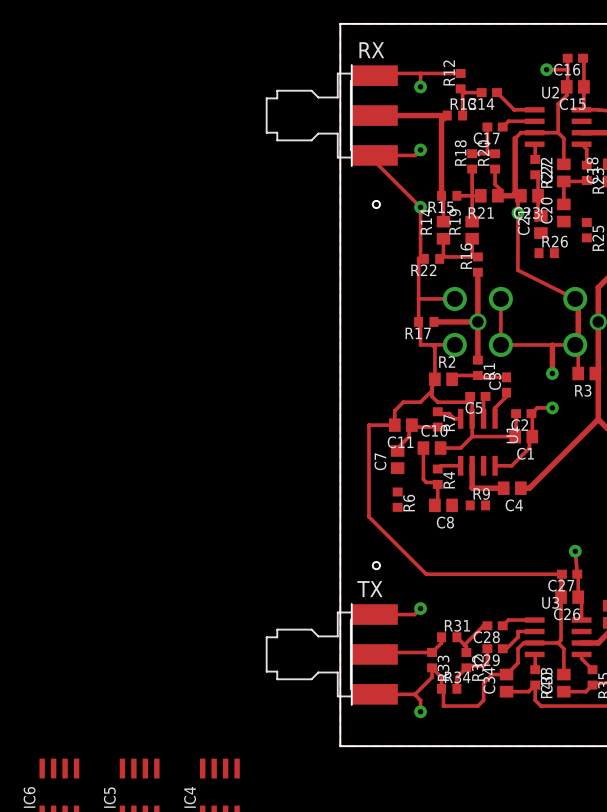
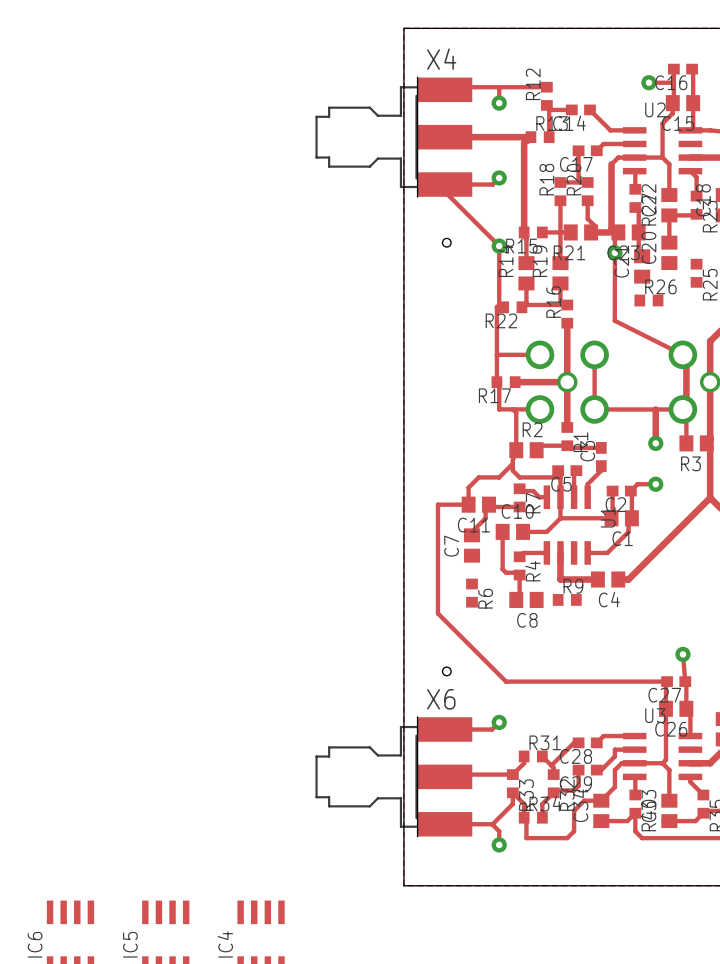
RX name: RX (371, 50) -> X4 (441, 59)
TX name: TX (369, 589) -> X6 (441, 699)

